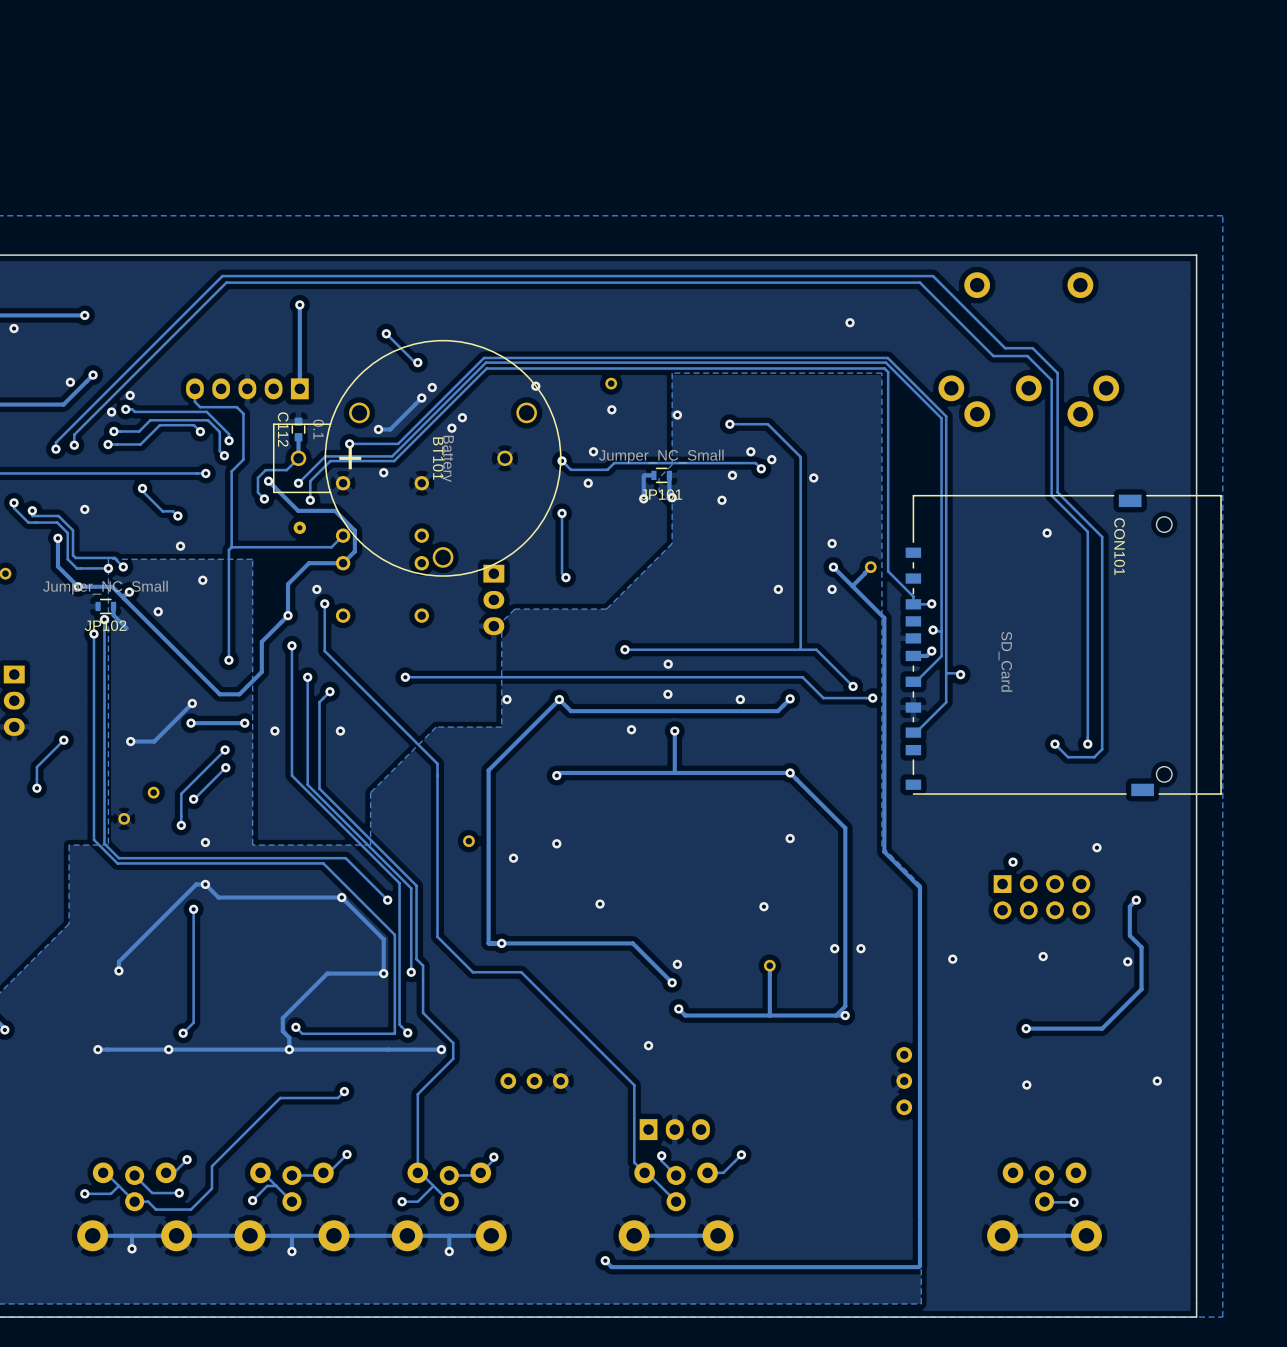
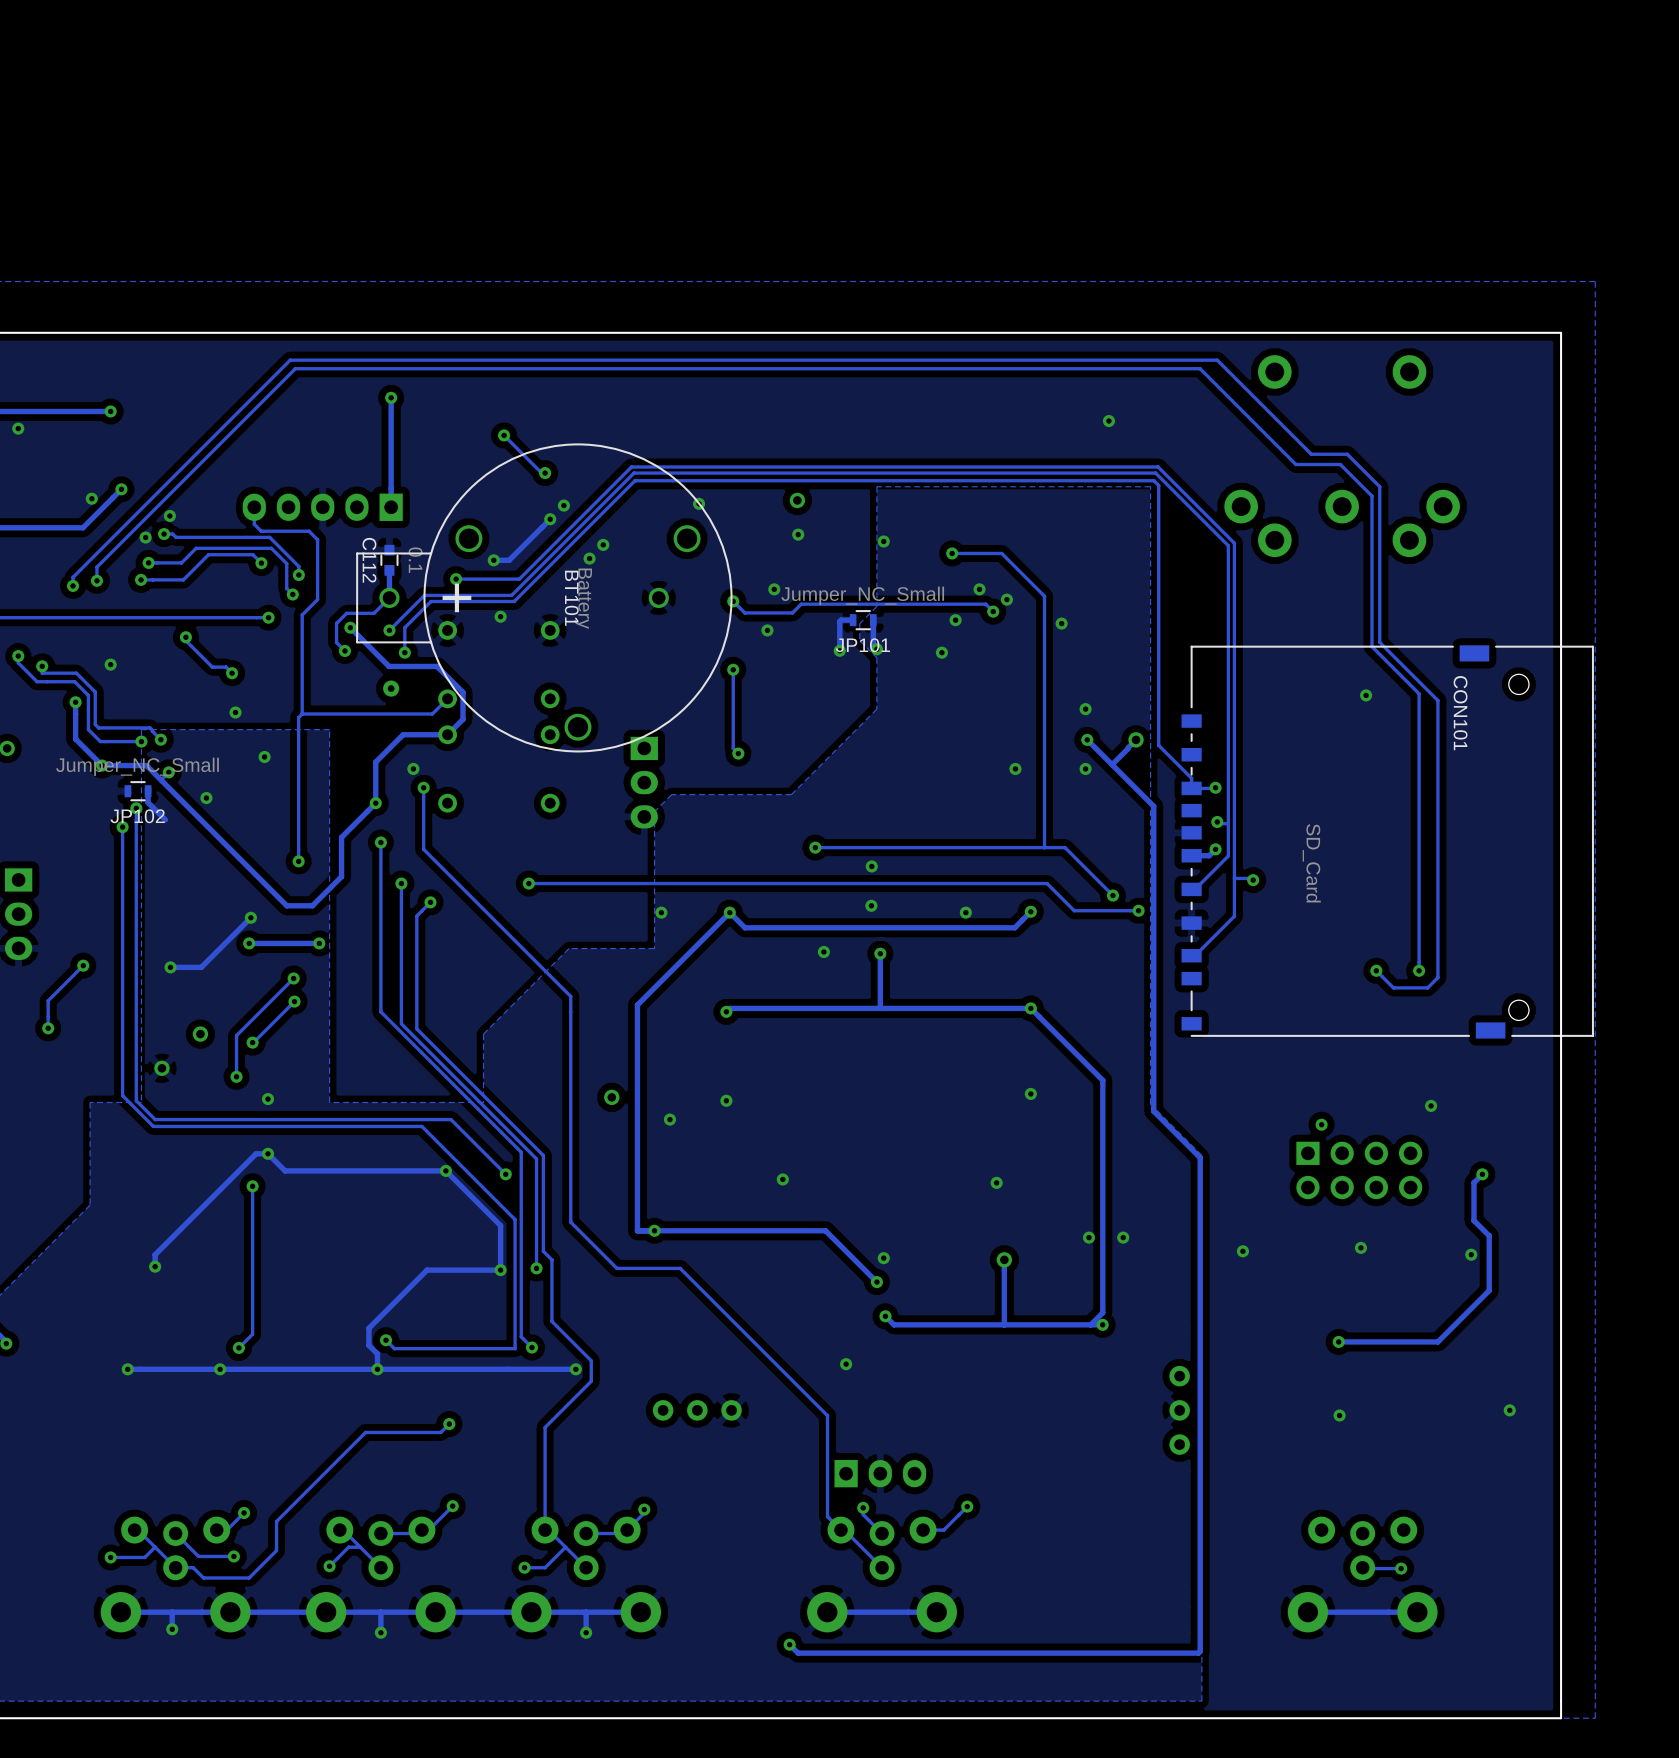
via: (274, 731) -> none
via: (340, 731) -> none

